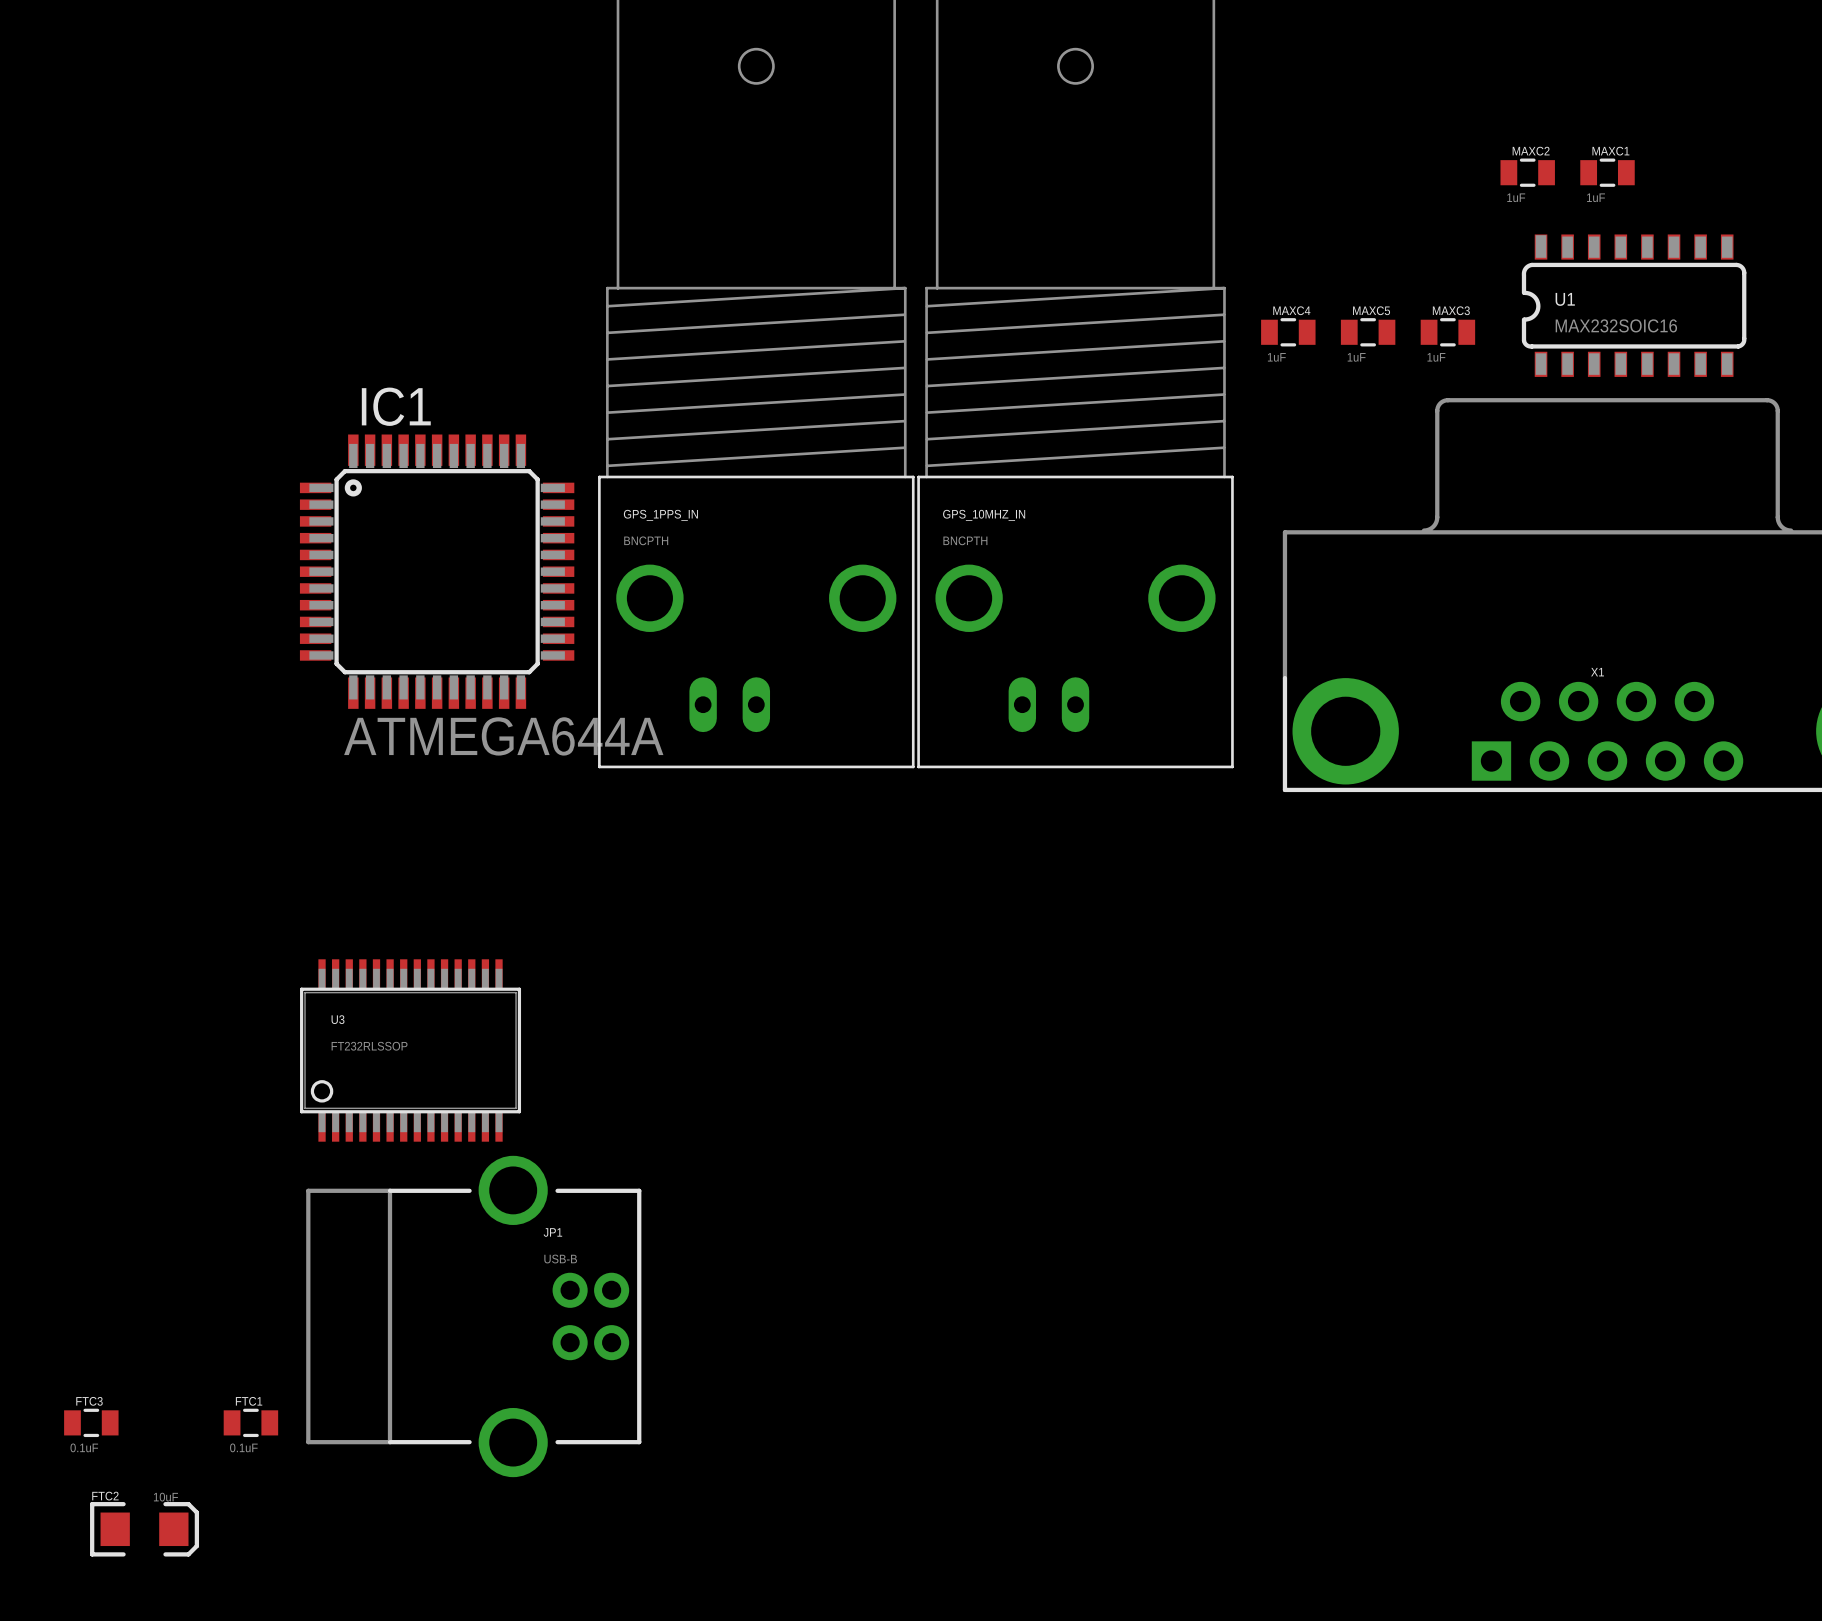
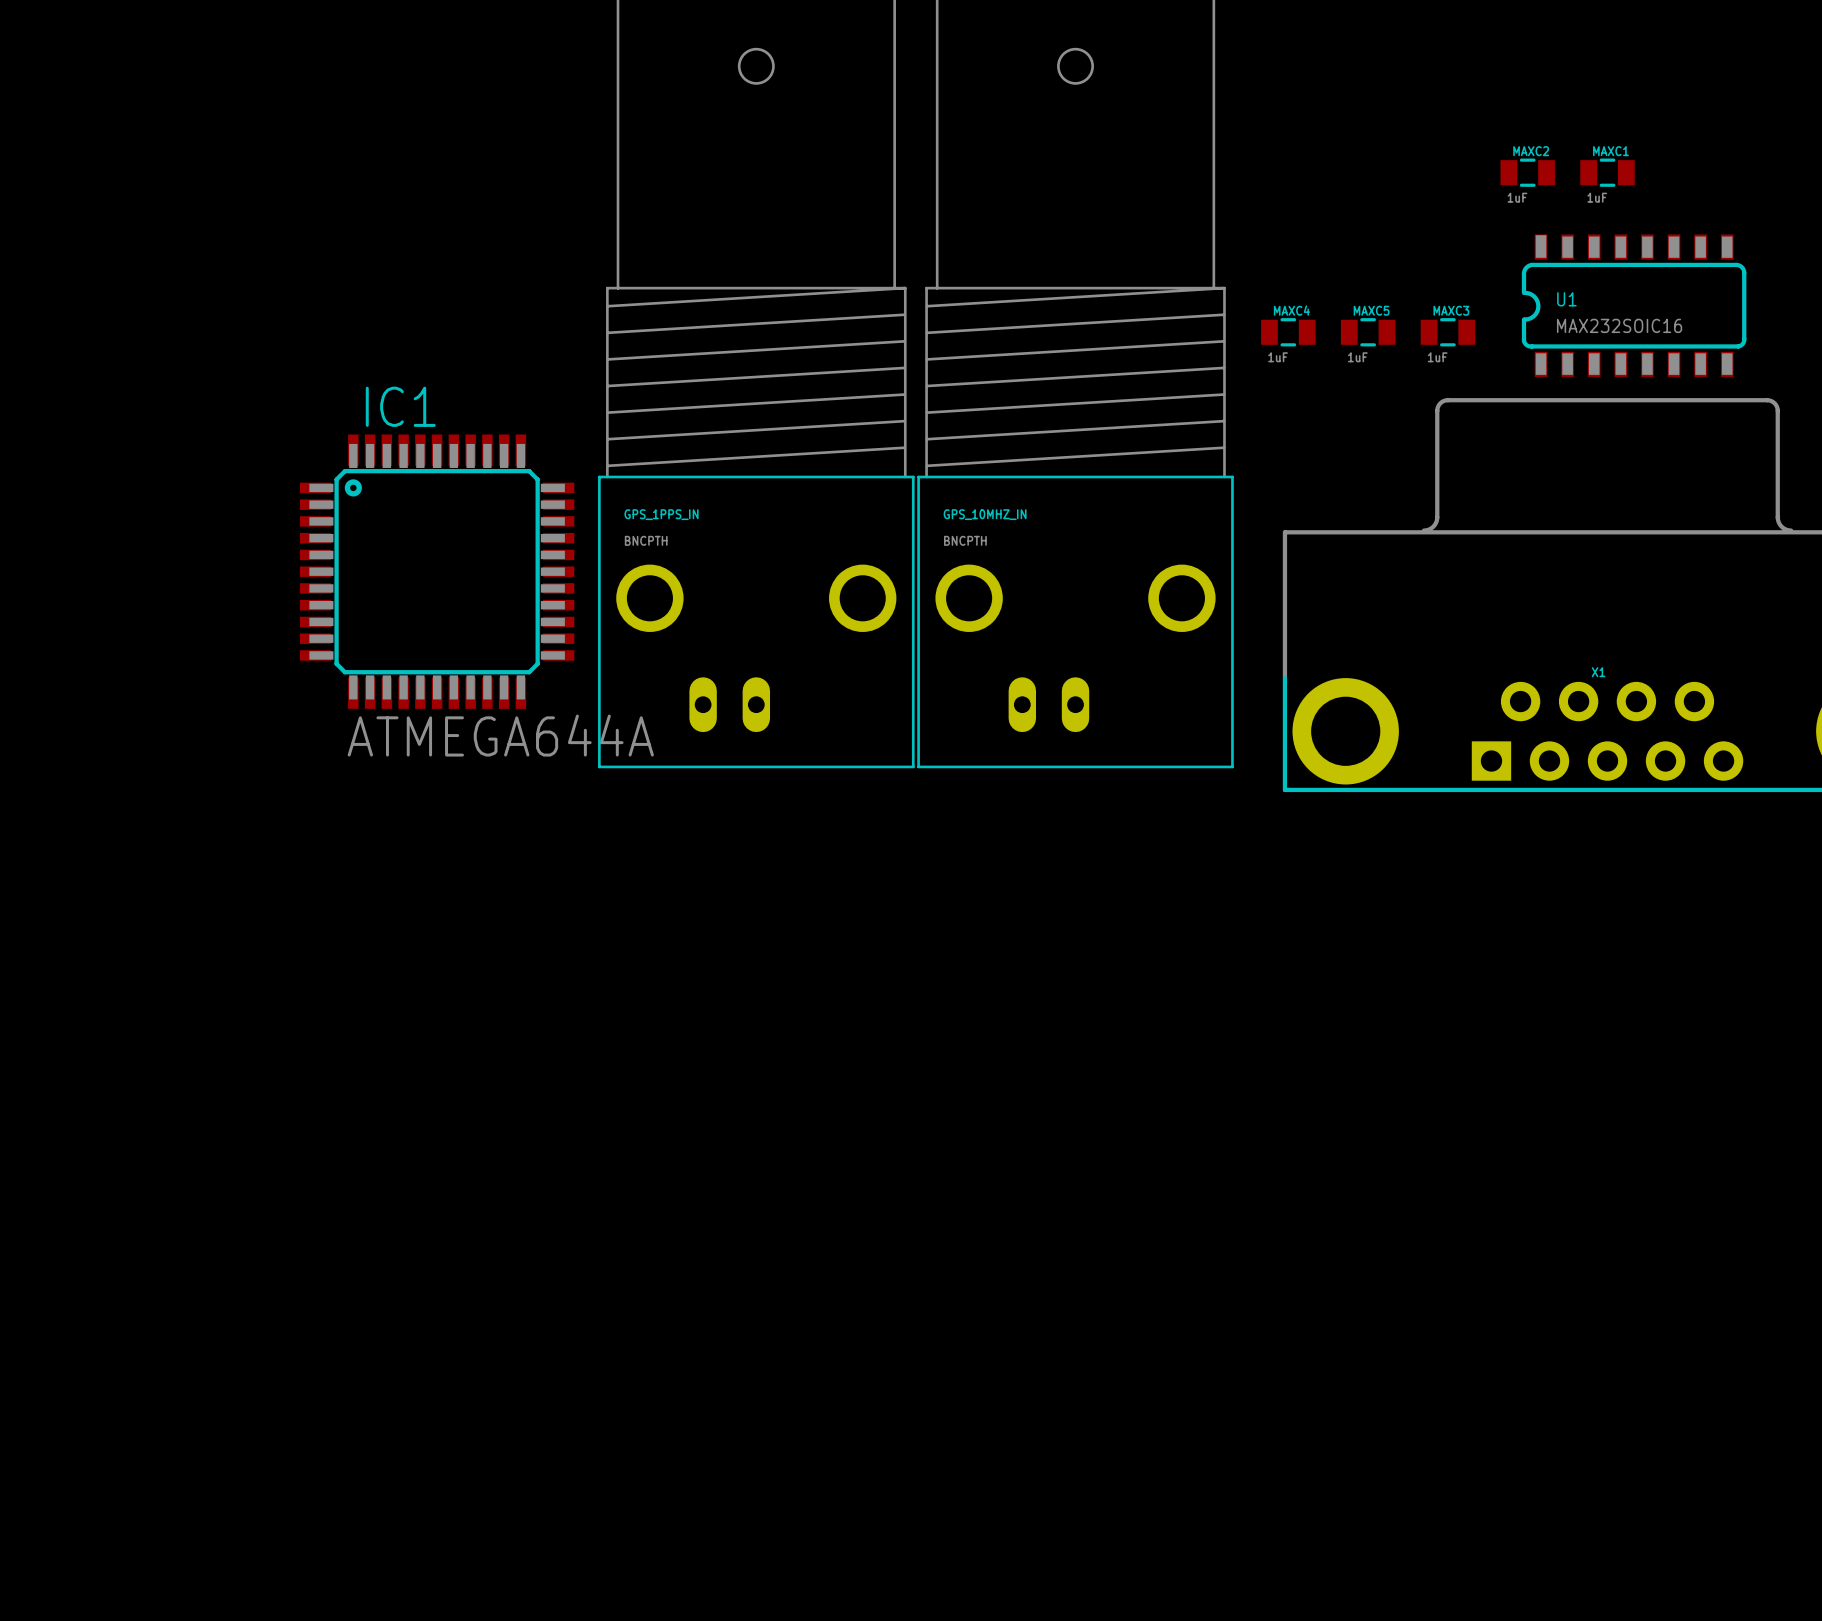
U3: FT232RLSSOP (410, 1050) -> none
JP1: USB-B (473, 1316) -> none
FTC3: 0.1uF (91, 1422) -> none
FTC1: 0.1uF (250, 1422) -> none
FTC2: 10uF (144, 1529) -> none

